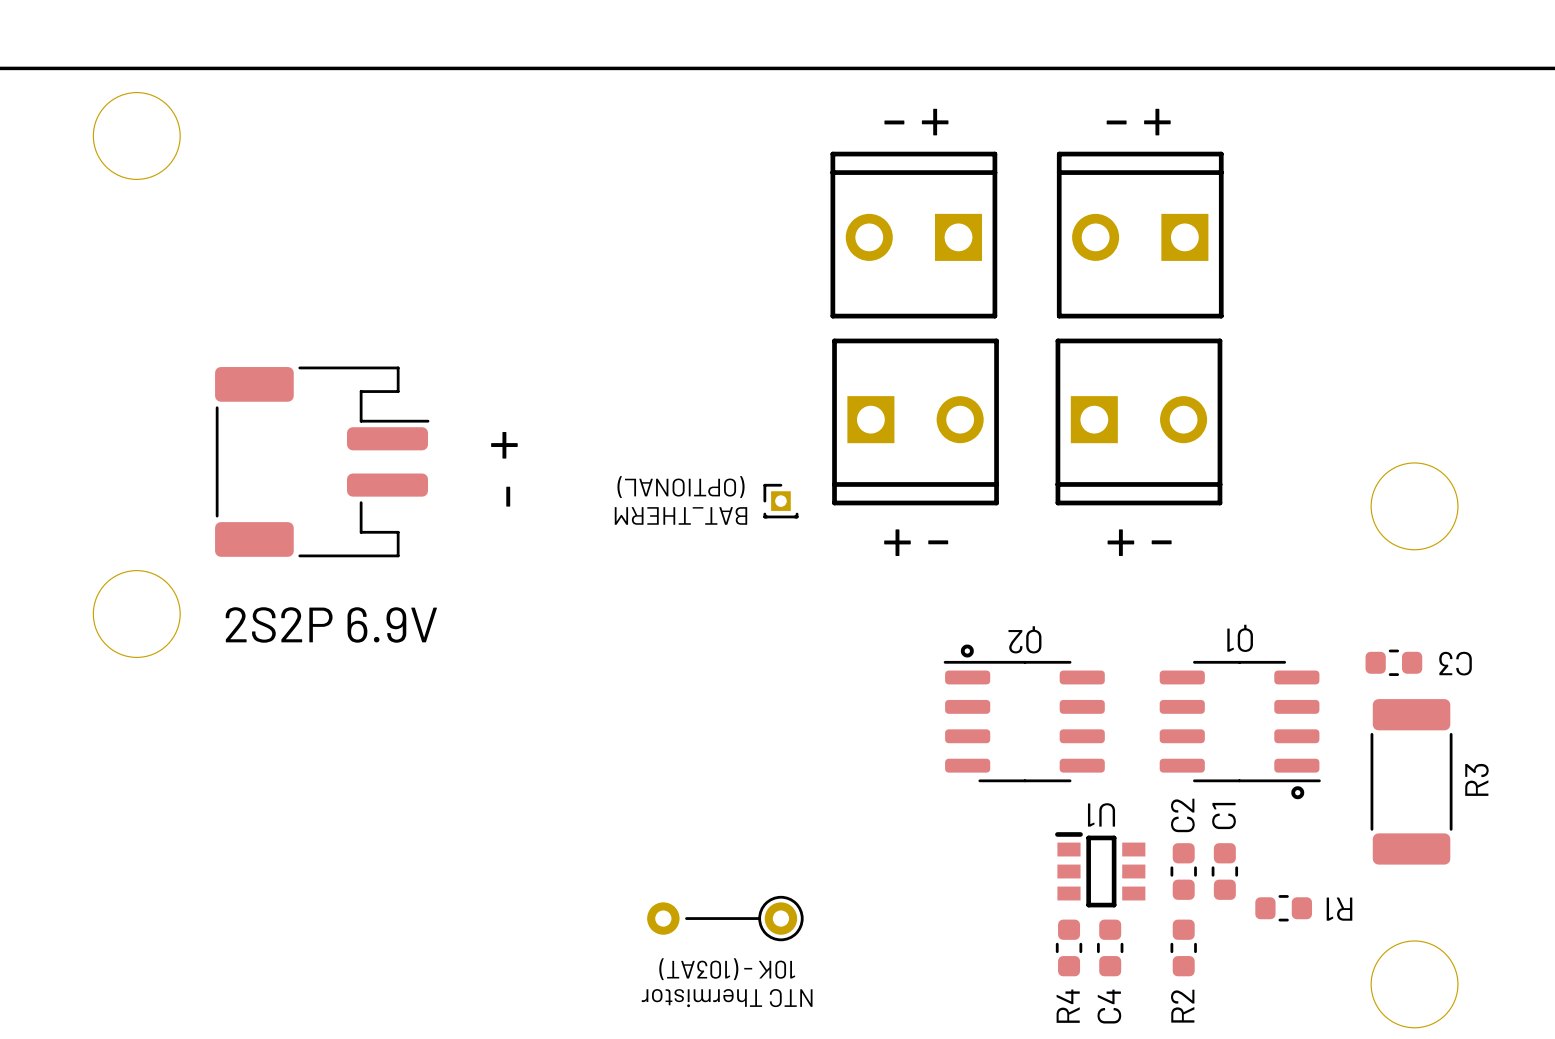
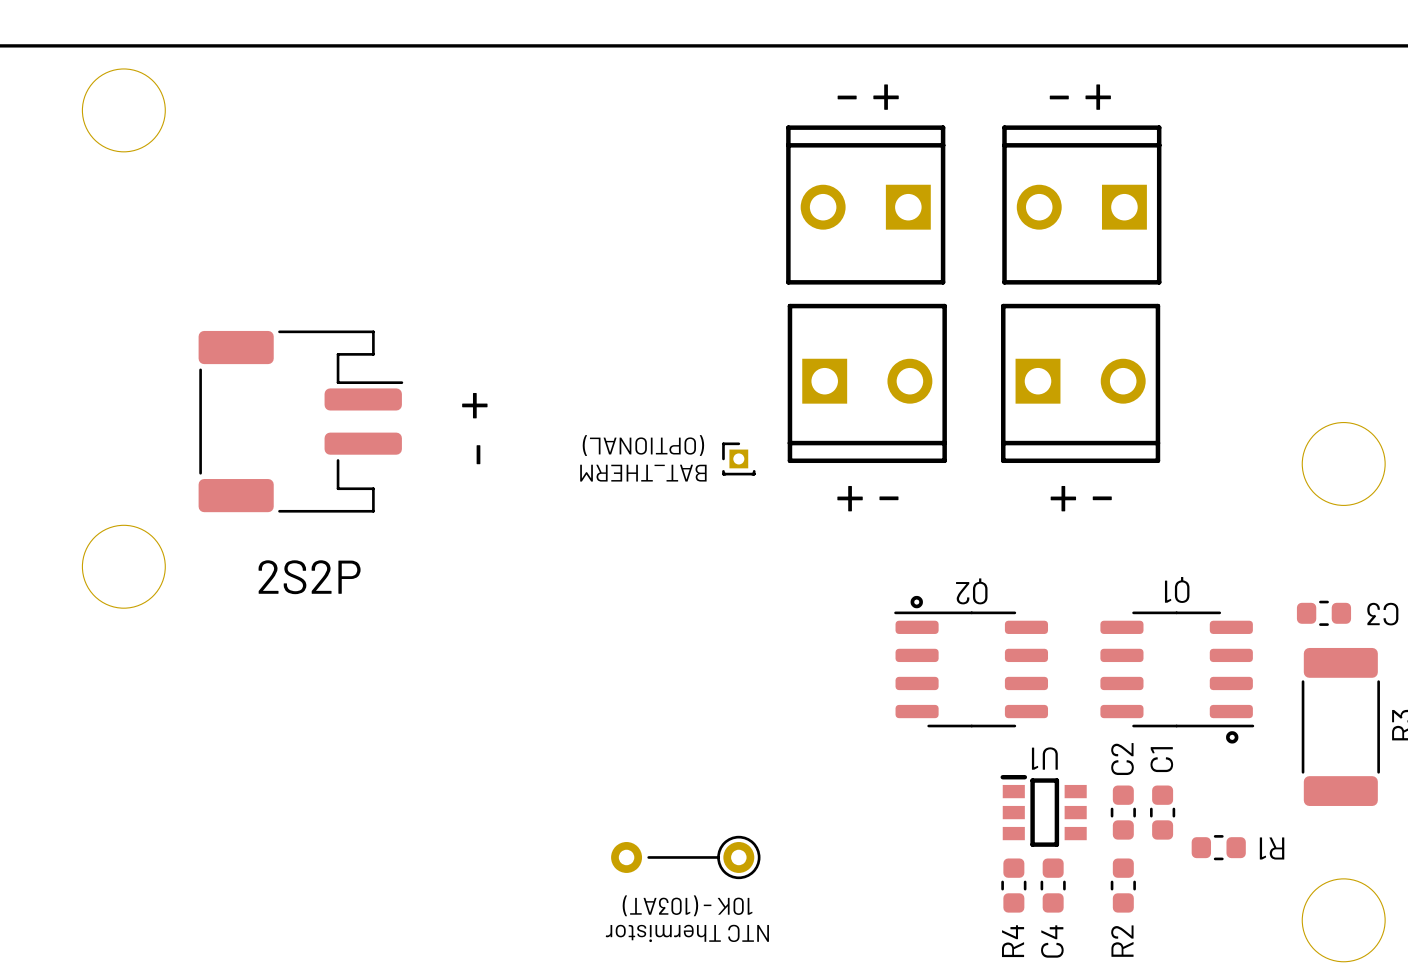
text: 2S2P 6.9V (331, 624) -> 2S2P (309, 577)

